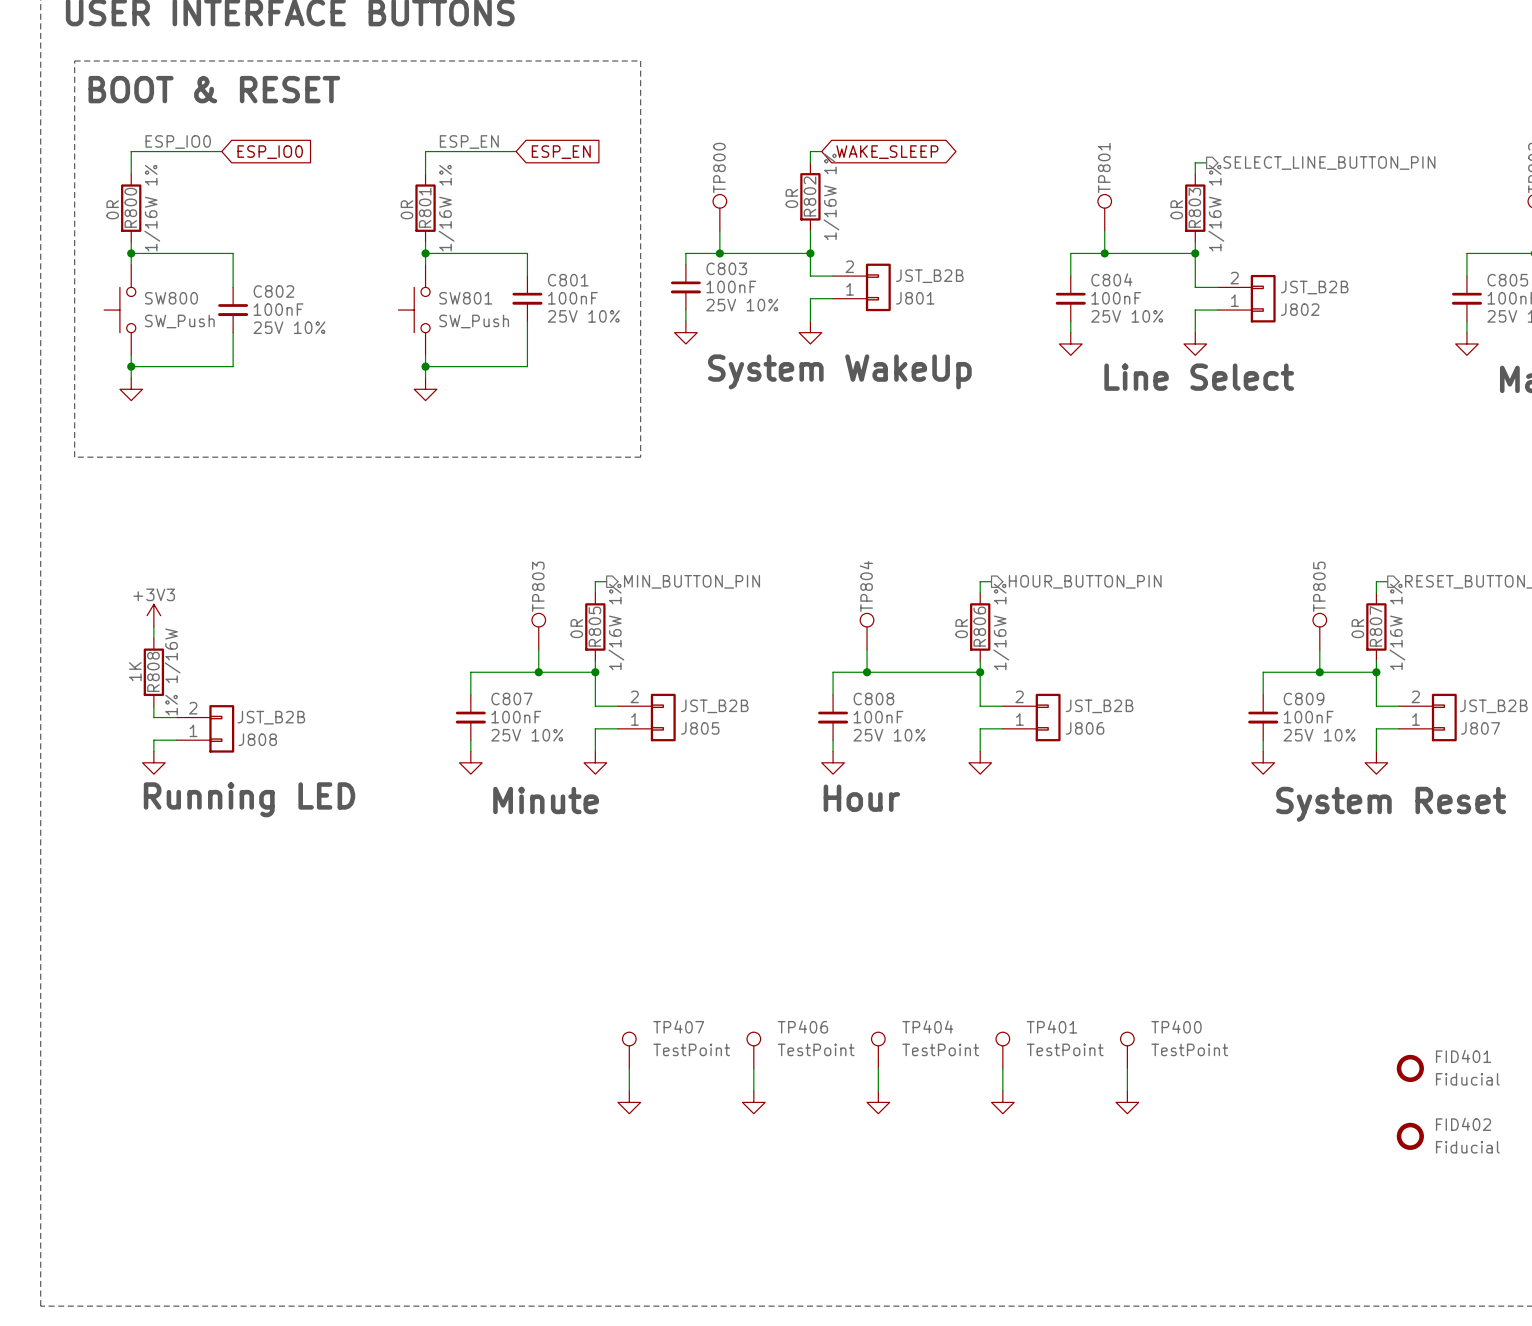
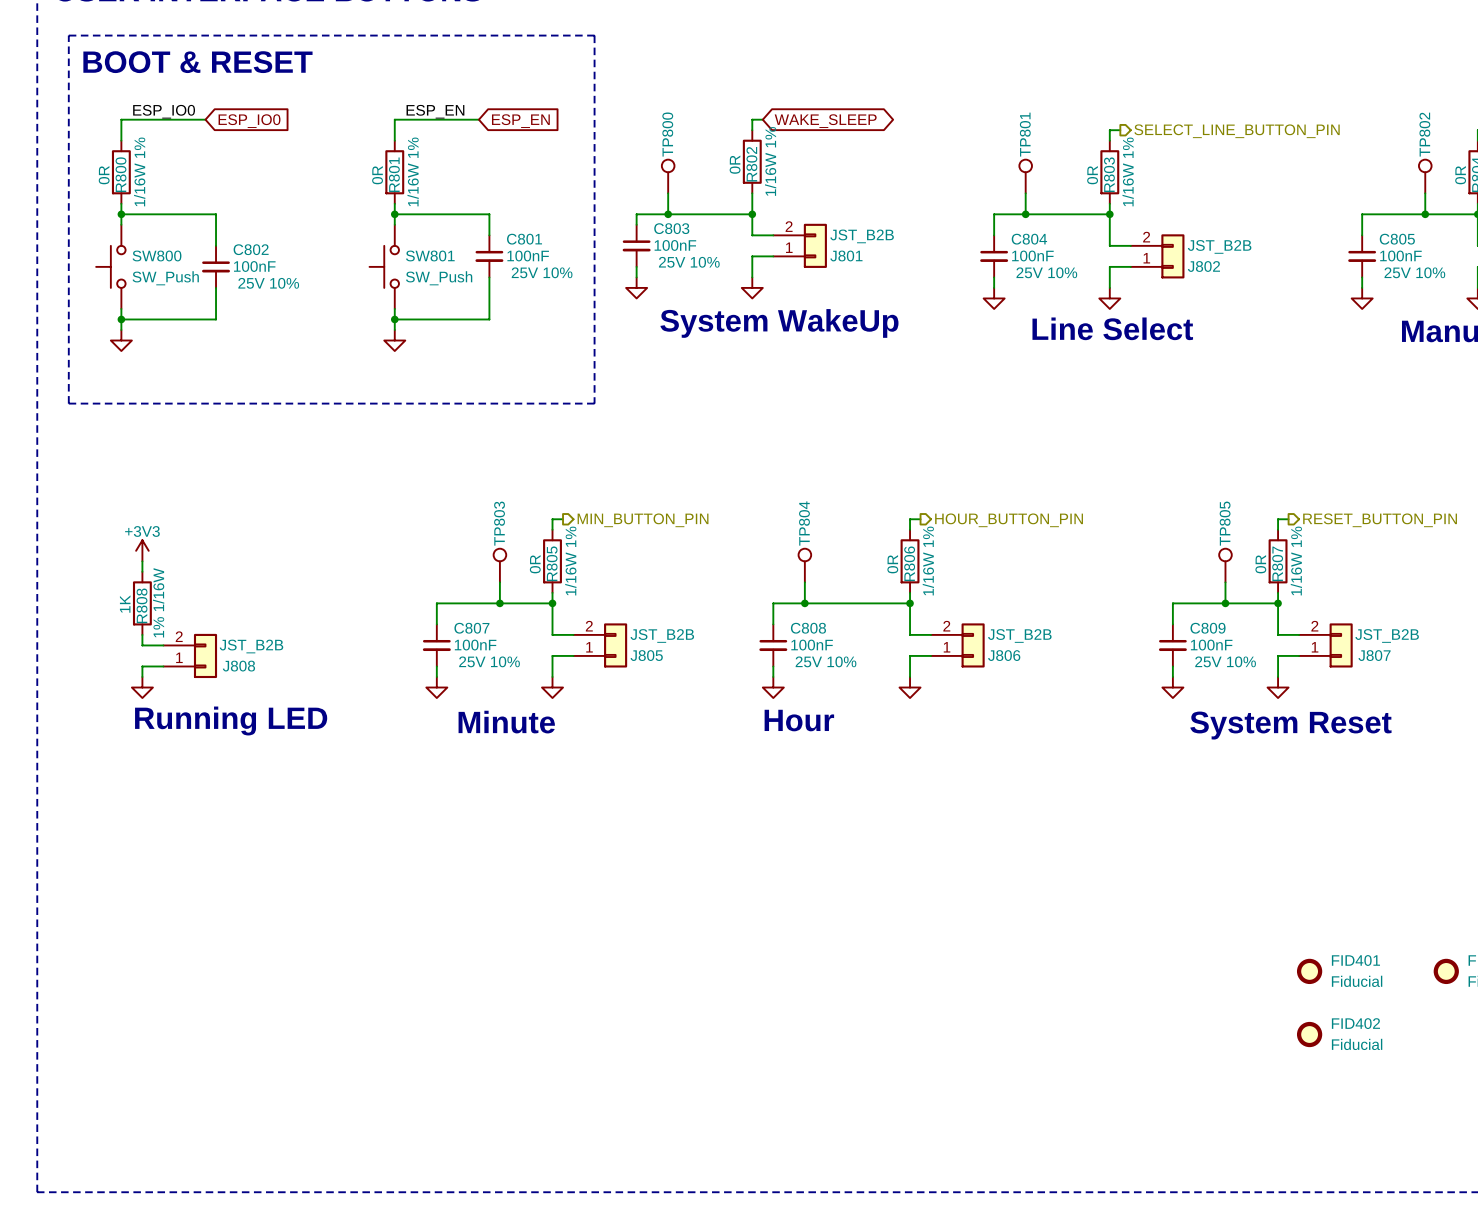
TP407: TestPoint (629, 1050) -> none
TP406: TestPoint (753, 1050) -> none
TP404: TestPoint (878, 1050) -> none
TP401: TestPoint (1002, 1050) -> none
TP400: TestPoint (1127, 1050) -> none
wire: (629, 1068) (629, 1091) -> none
wire: (753, 1068) (753, 1091) -> none
wire: (878, 1068) (878, 1091) -> none
wire: (1002, 1068) (1002, 1091) -> none
wire: (1127, 1068) (1127, 1091) -> none
power symbol: (629, 1102) -> none
power symbol: (753, 1102) -> none
power symbol: (878, 1102) -> none
power symbol: (1002, 1102) -> none
power symbol: (1127, 1102) -> none

